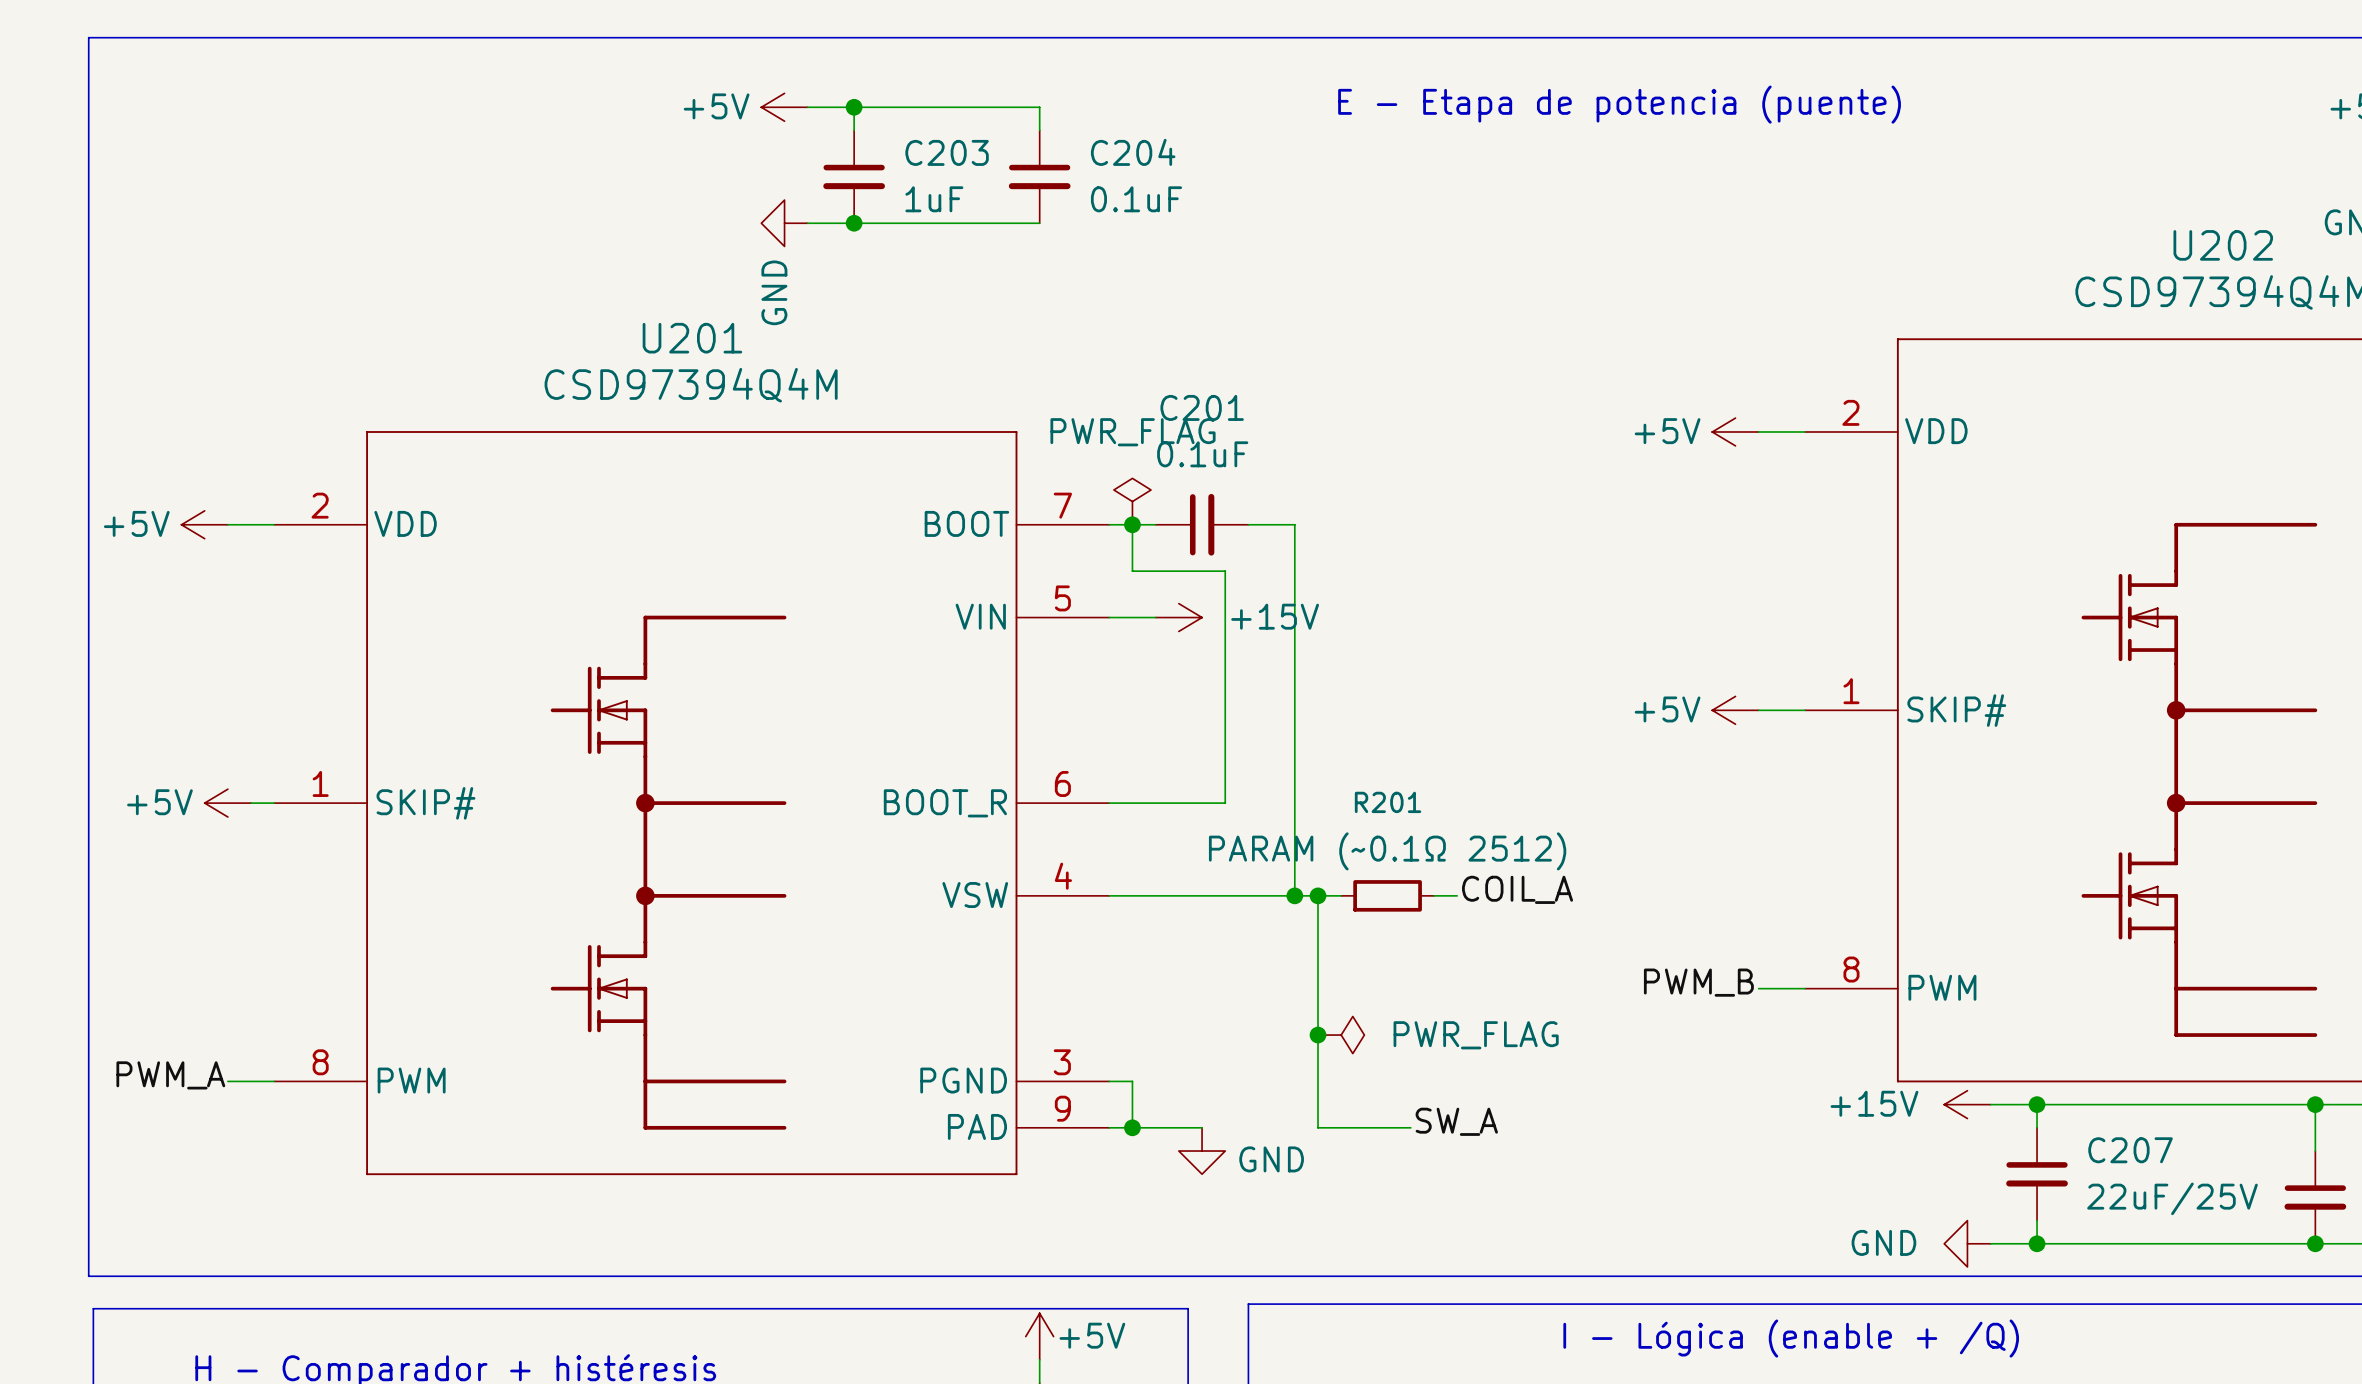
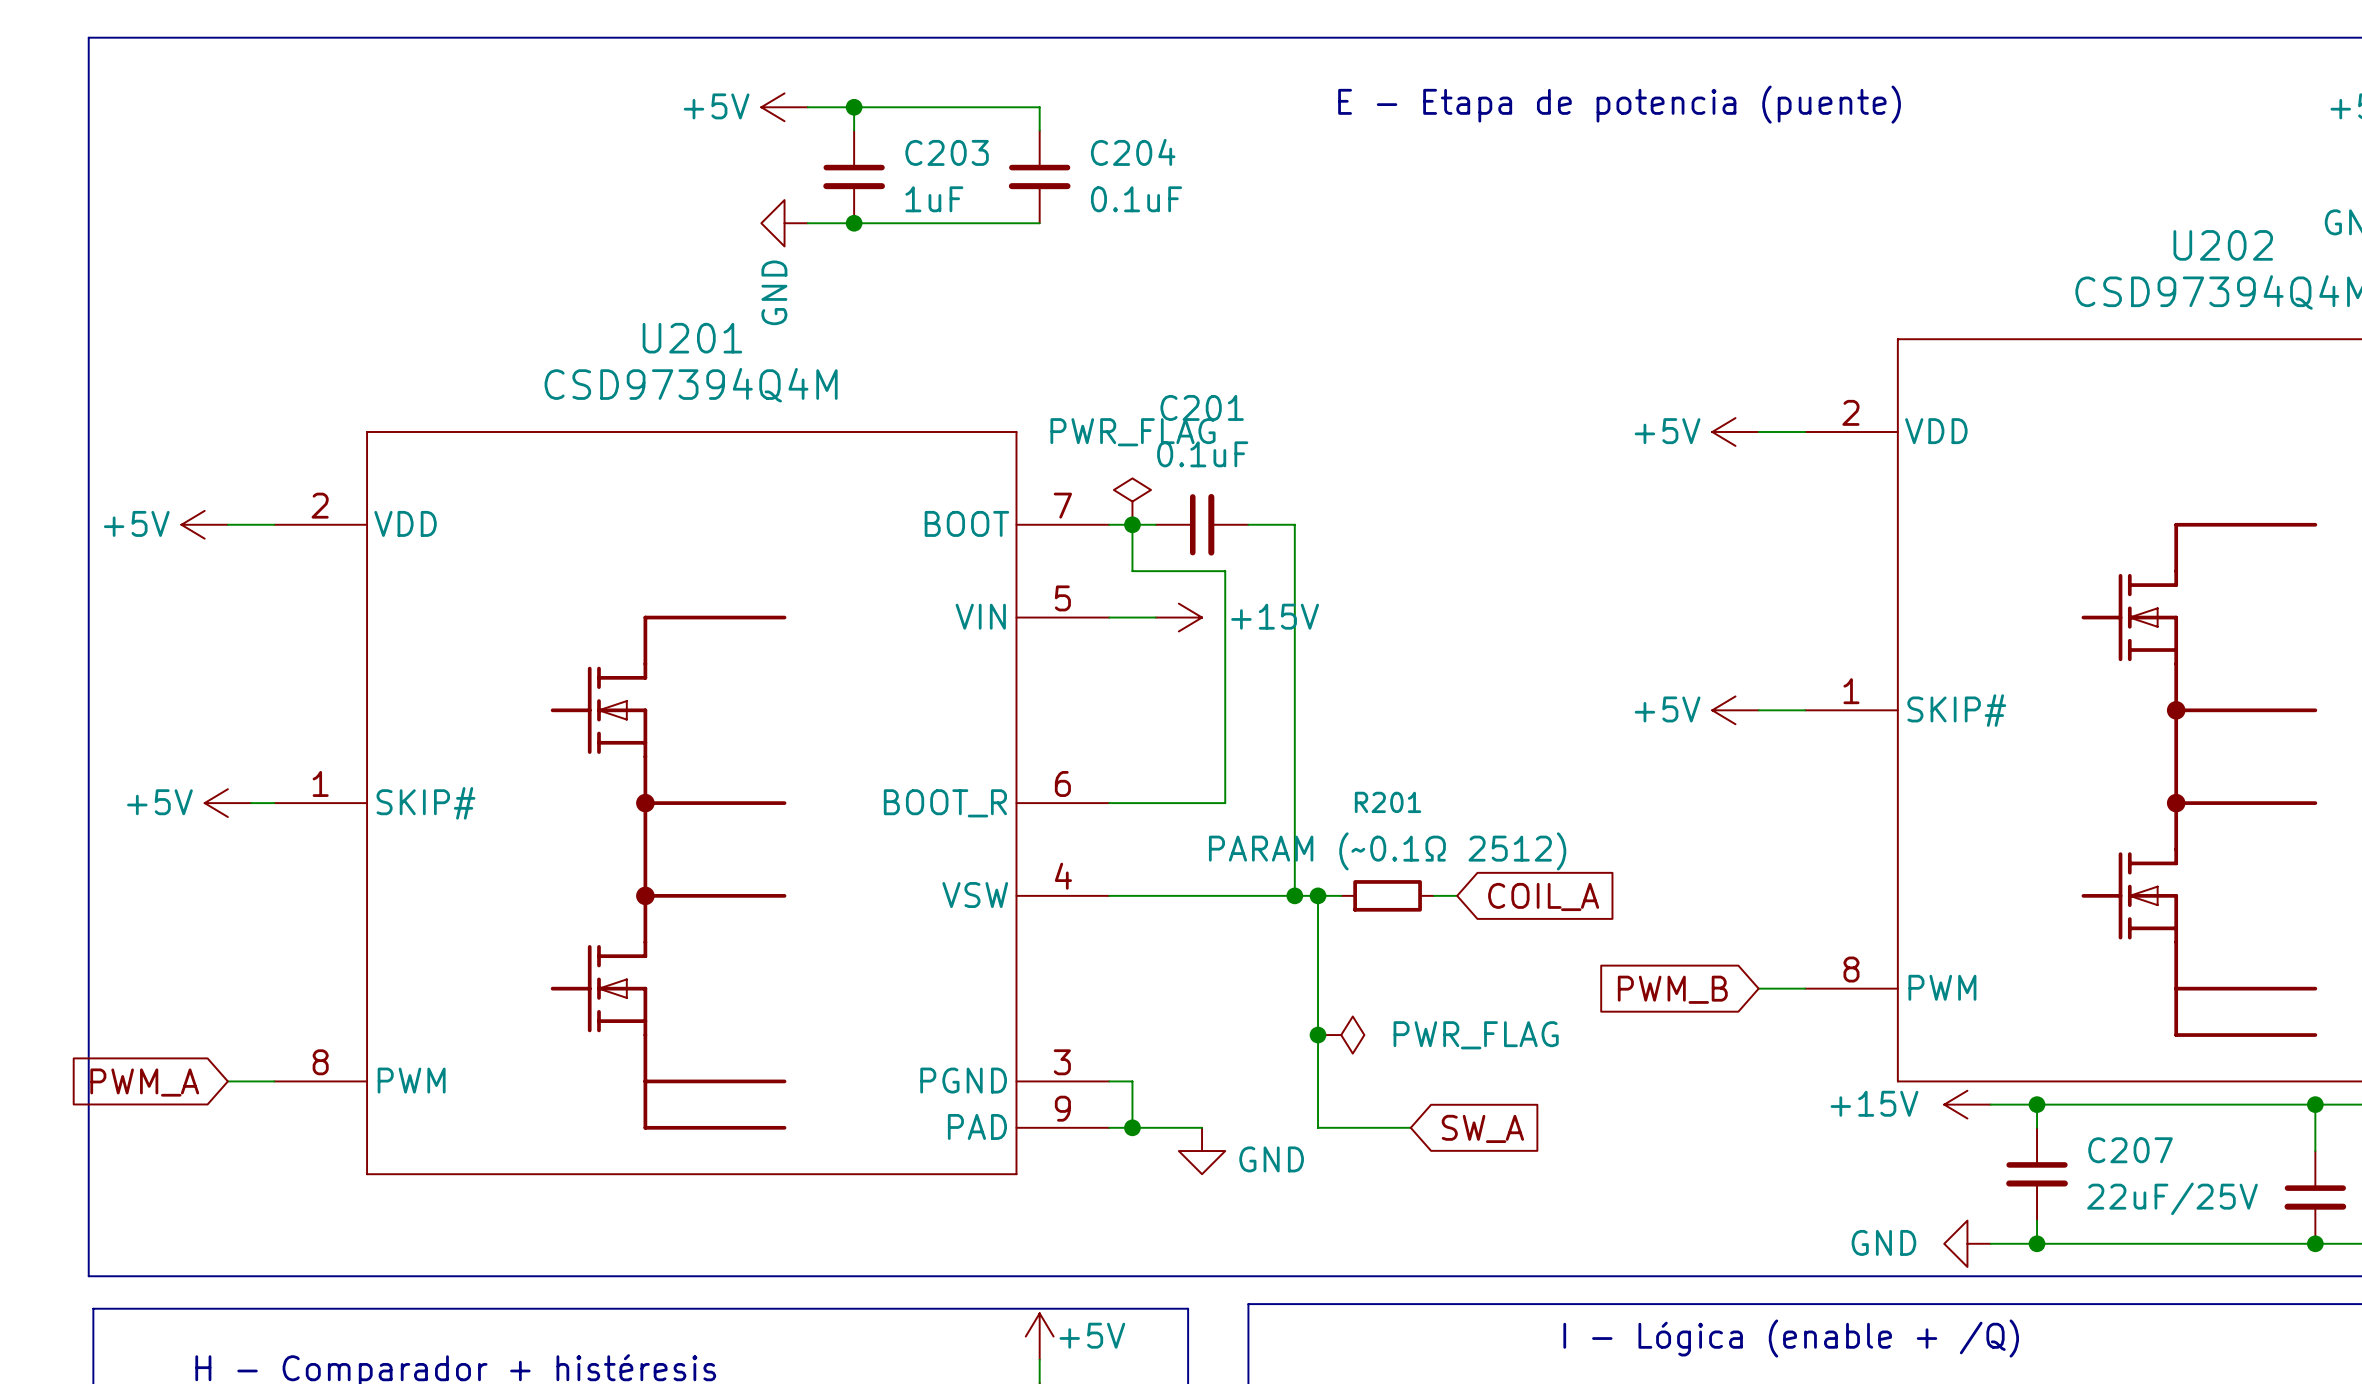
label: COIL_A (1517, 889) -> none
global label: none -> COIL_A (1543, 896)
label: PWM_B (1698, 982) -> none
global label: none -> PWM_B (1672, 989)
label: PWM_A (170, 1075) -> none
global label: none -> PWM_A (144, 1082)
label: SW_A (1456, 1121) -> none
global label: none -> SW_A (1482, 1128)

